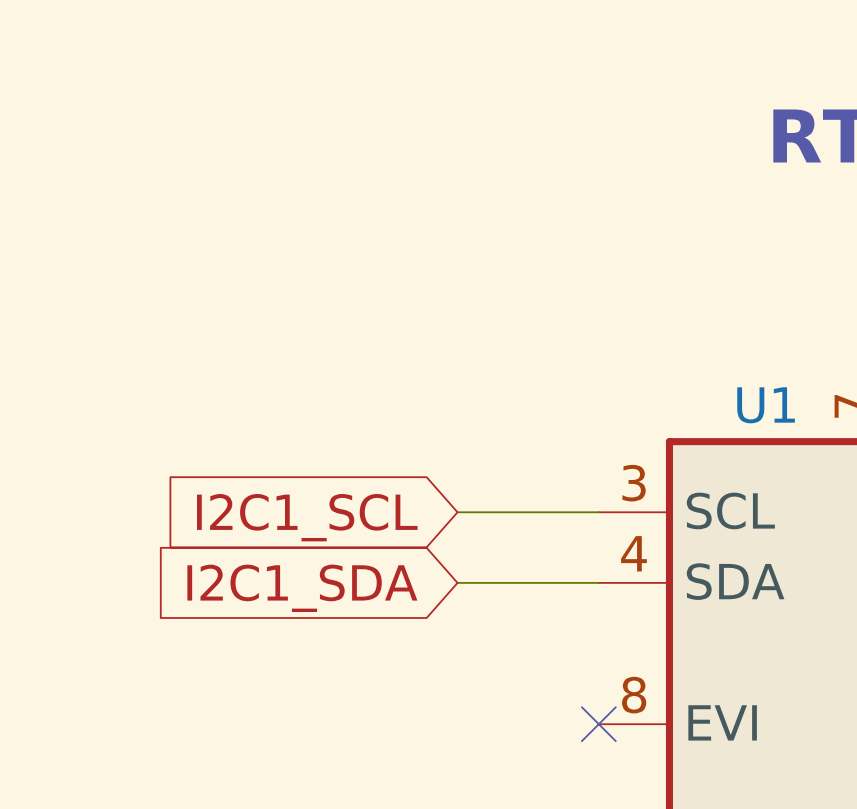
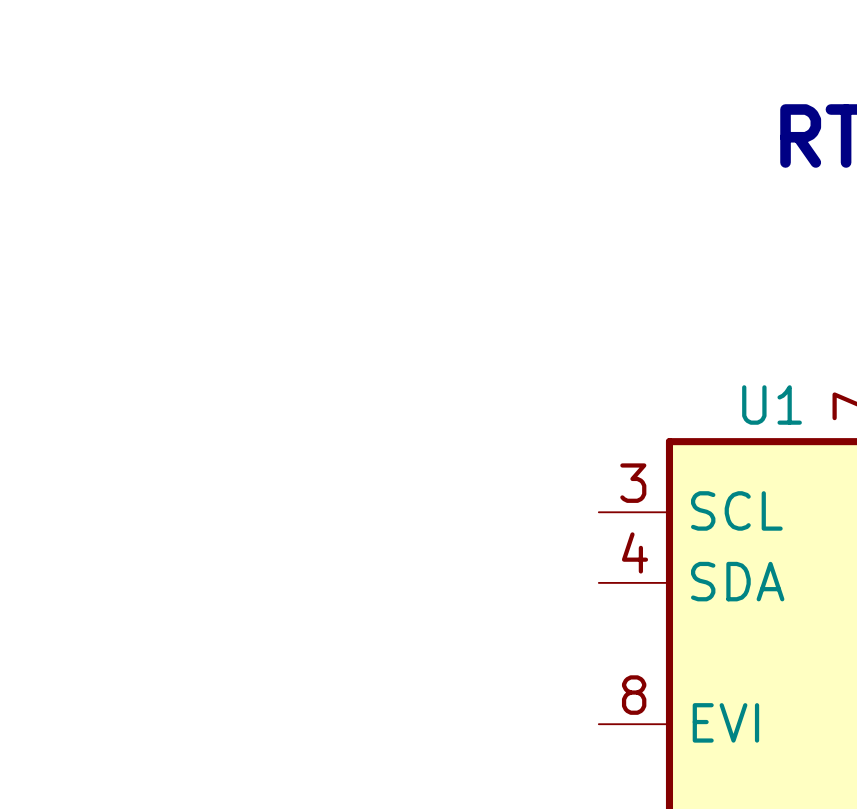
wire: (457, 512) (598, 512) -> none
global label: I2C1_SCL (307, 517) -> none
wire: (457, 582) (598, 582) -> none
global label: I2C1_SDA (302, 588) -> none
no-connect mark: (598, 724) -> none

